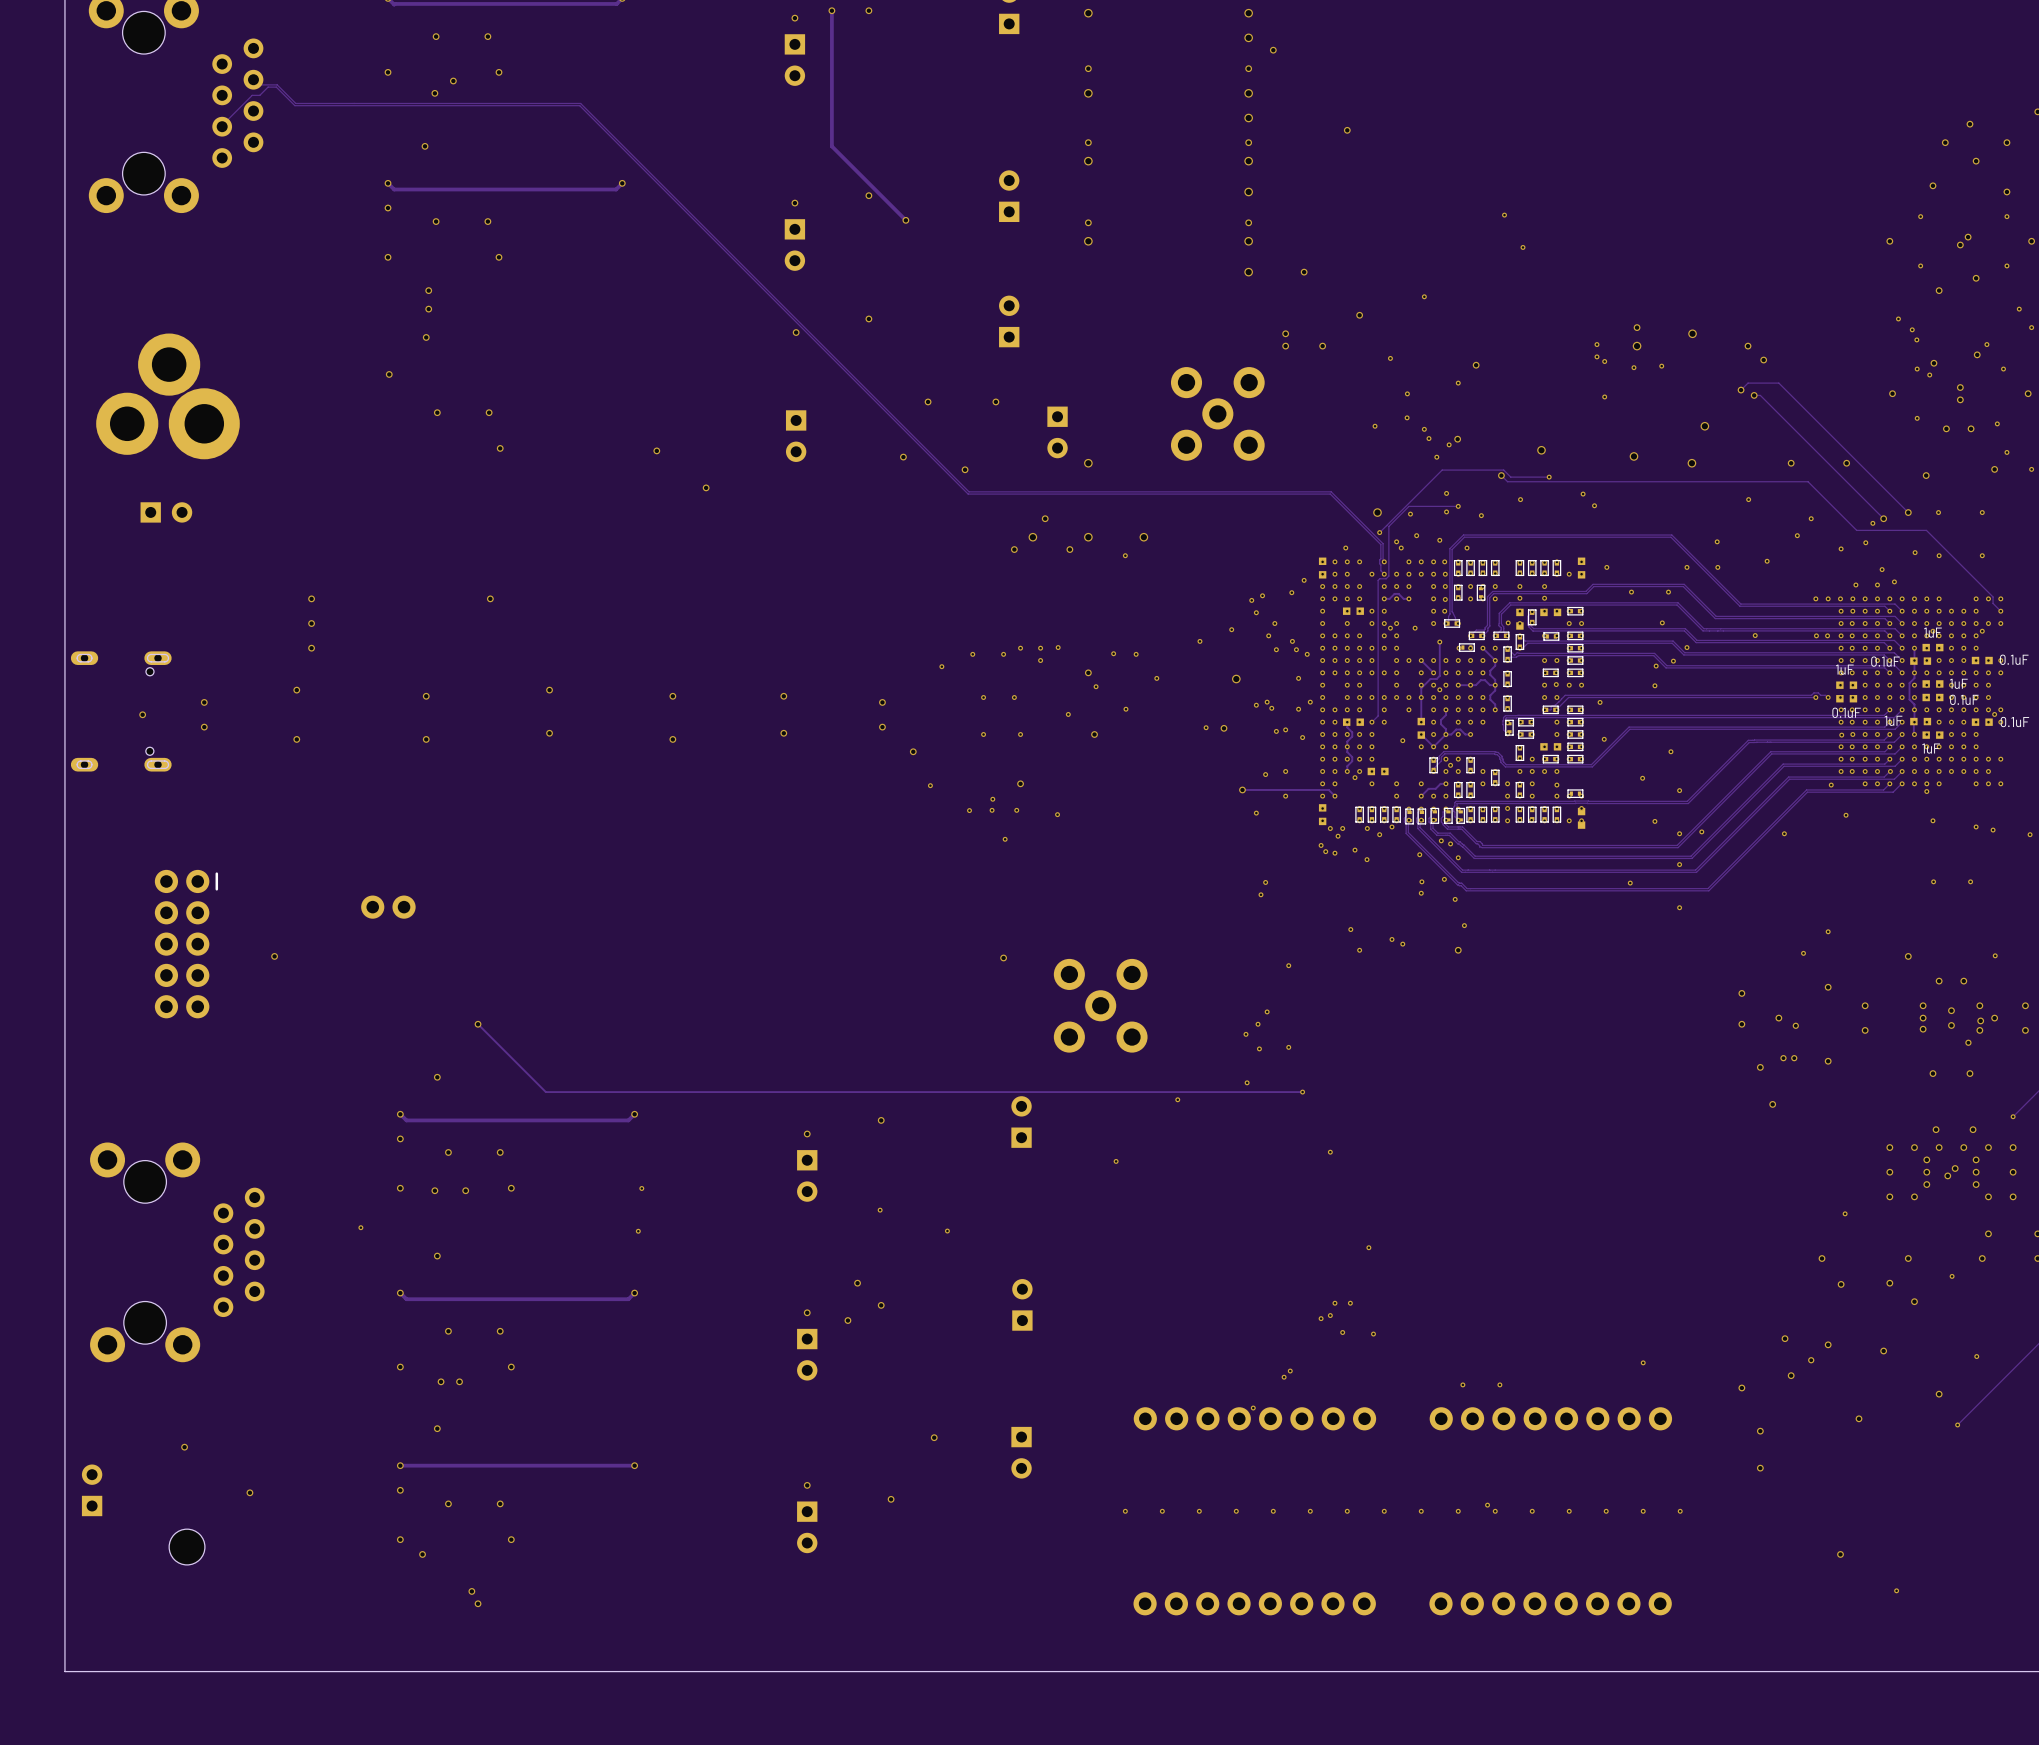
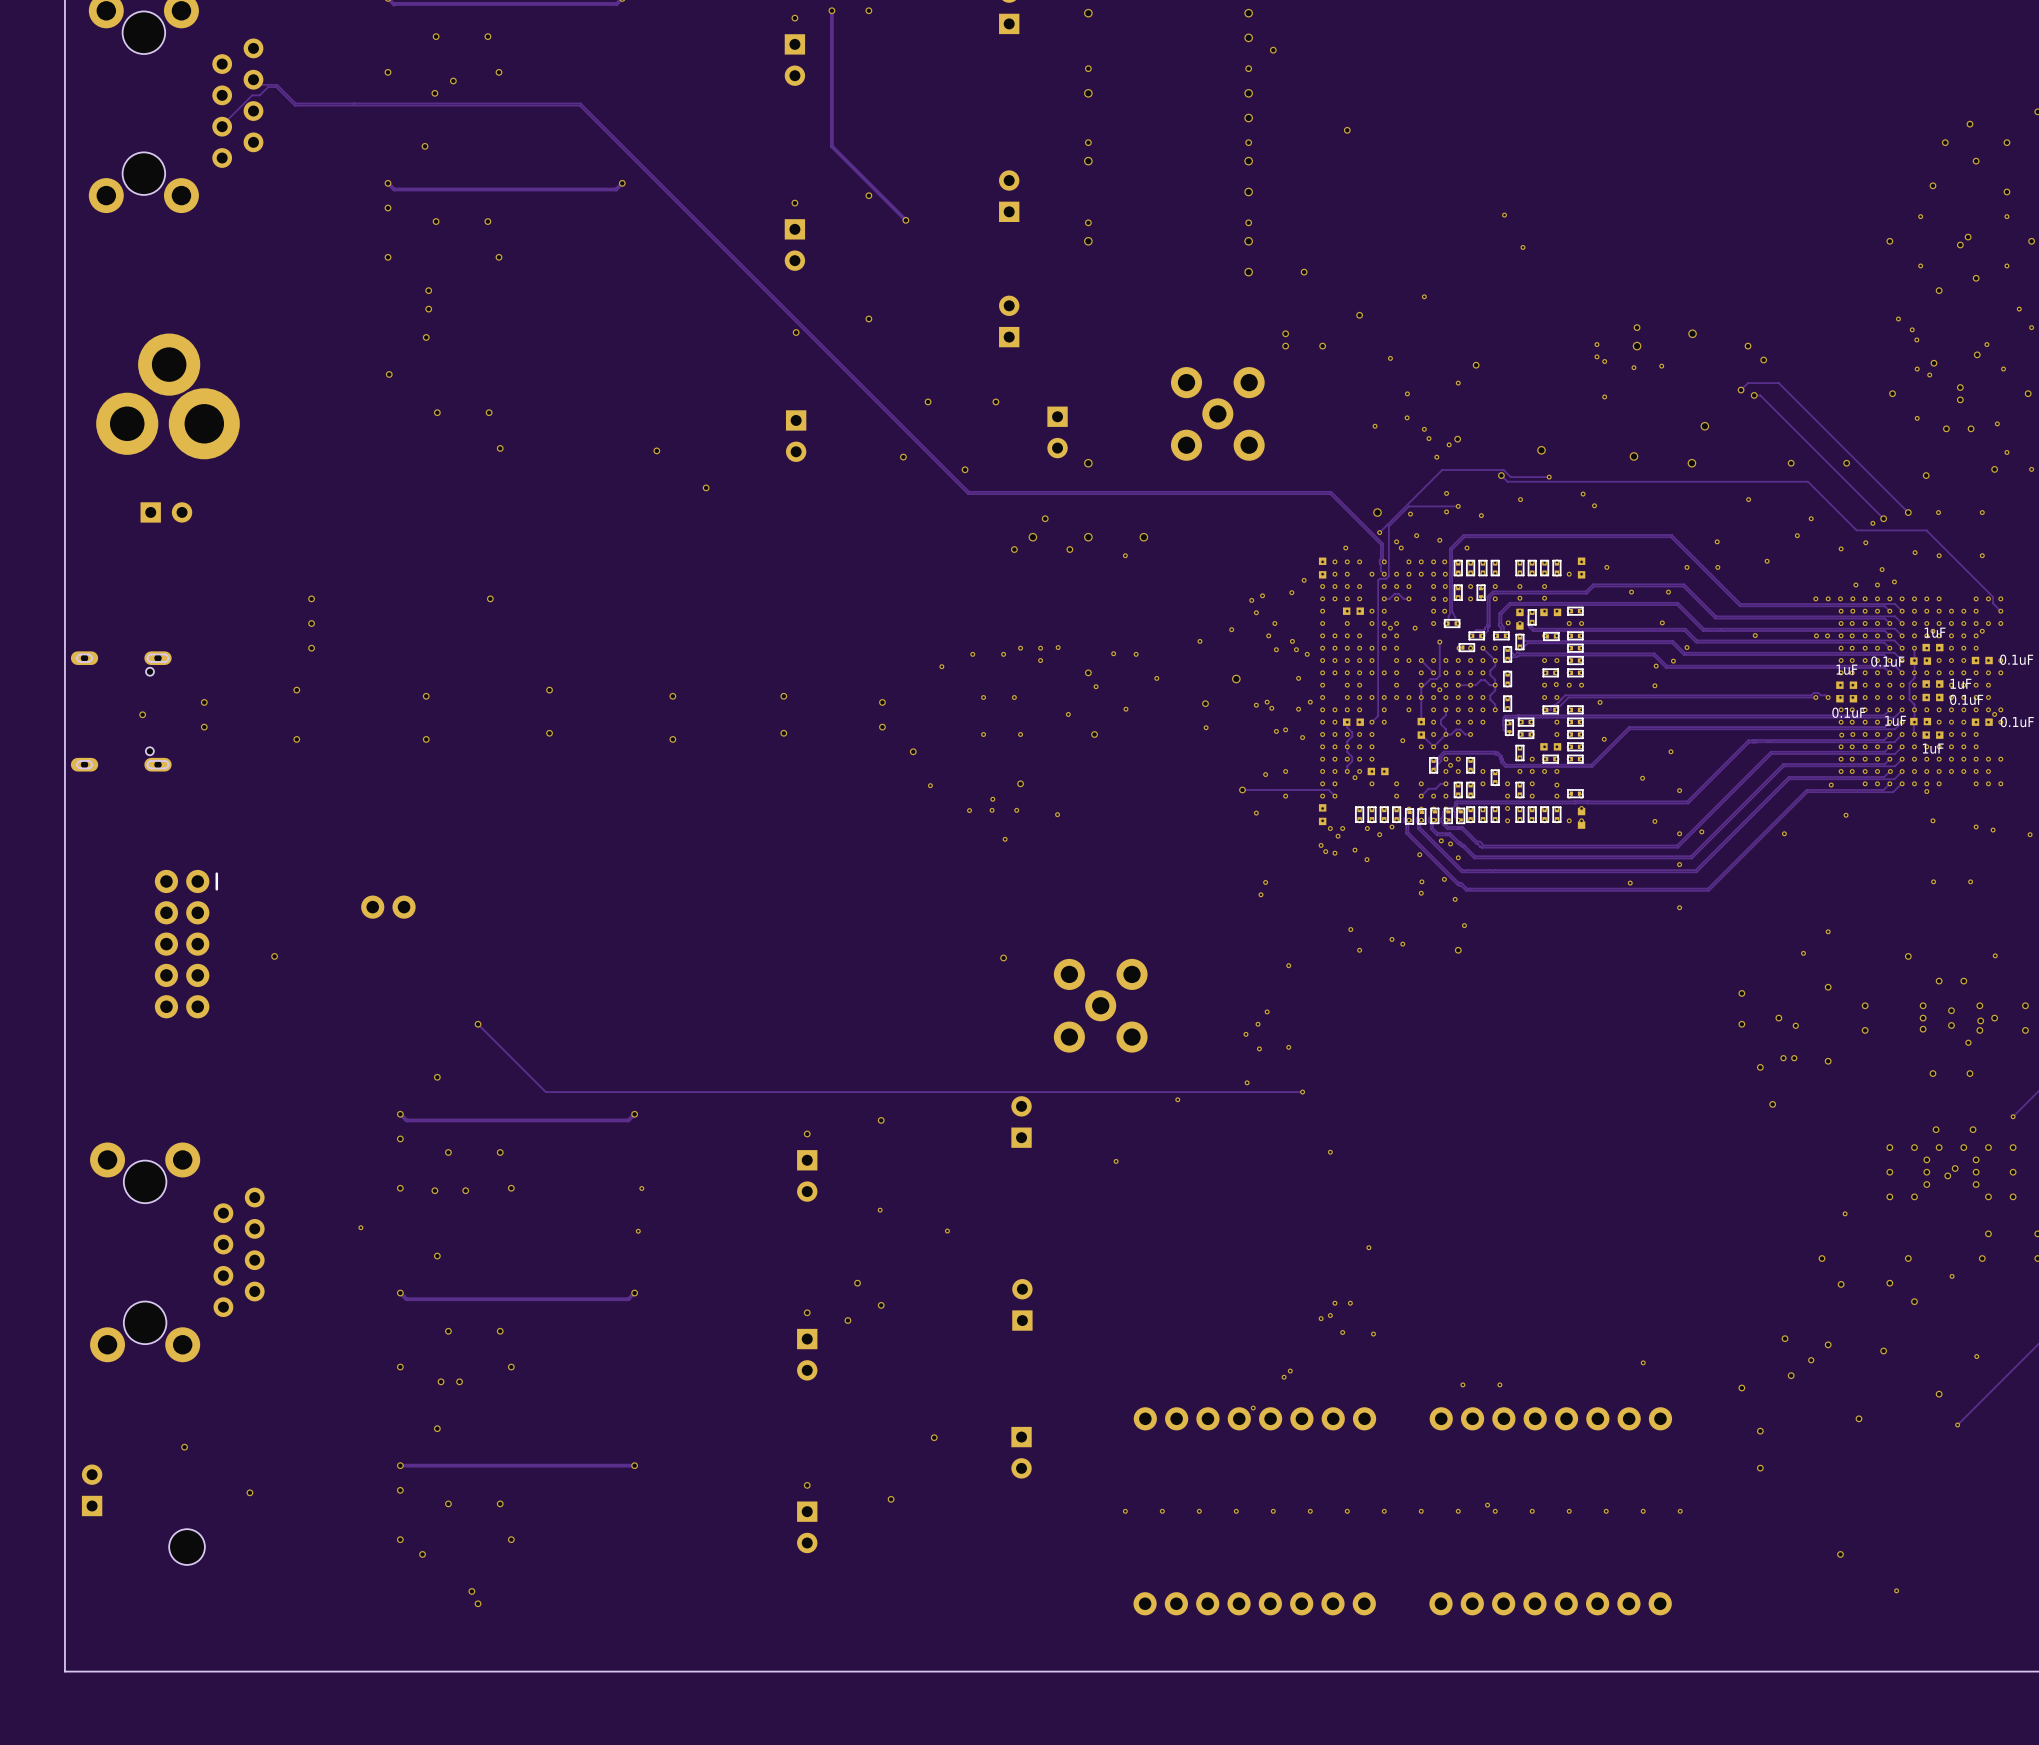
via position: (1223, 728) -> (1205, 703)

